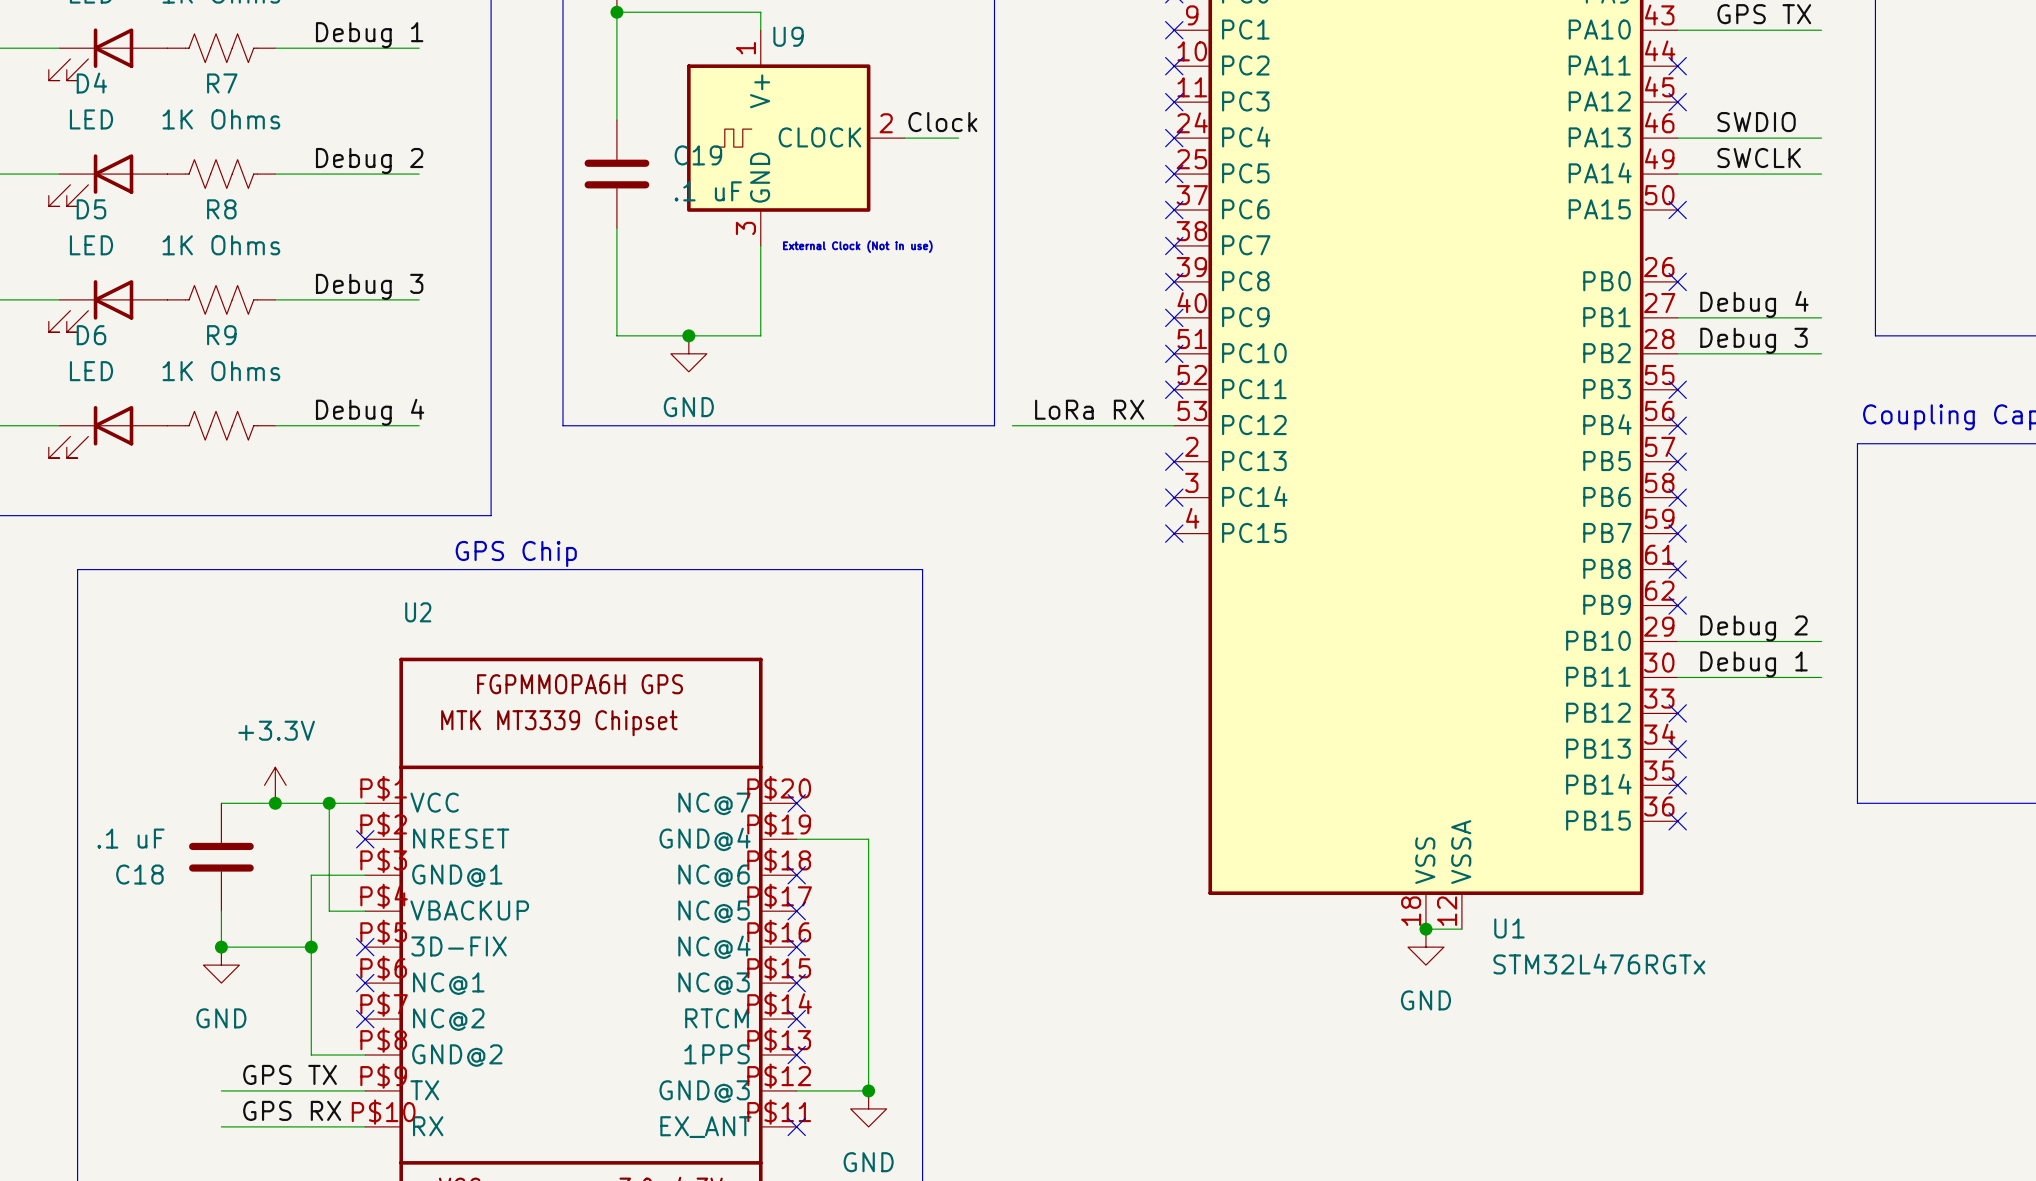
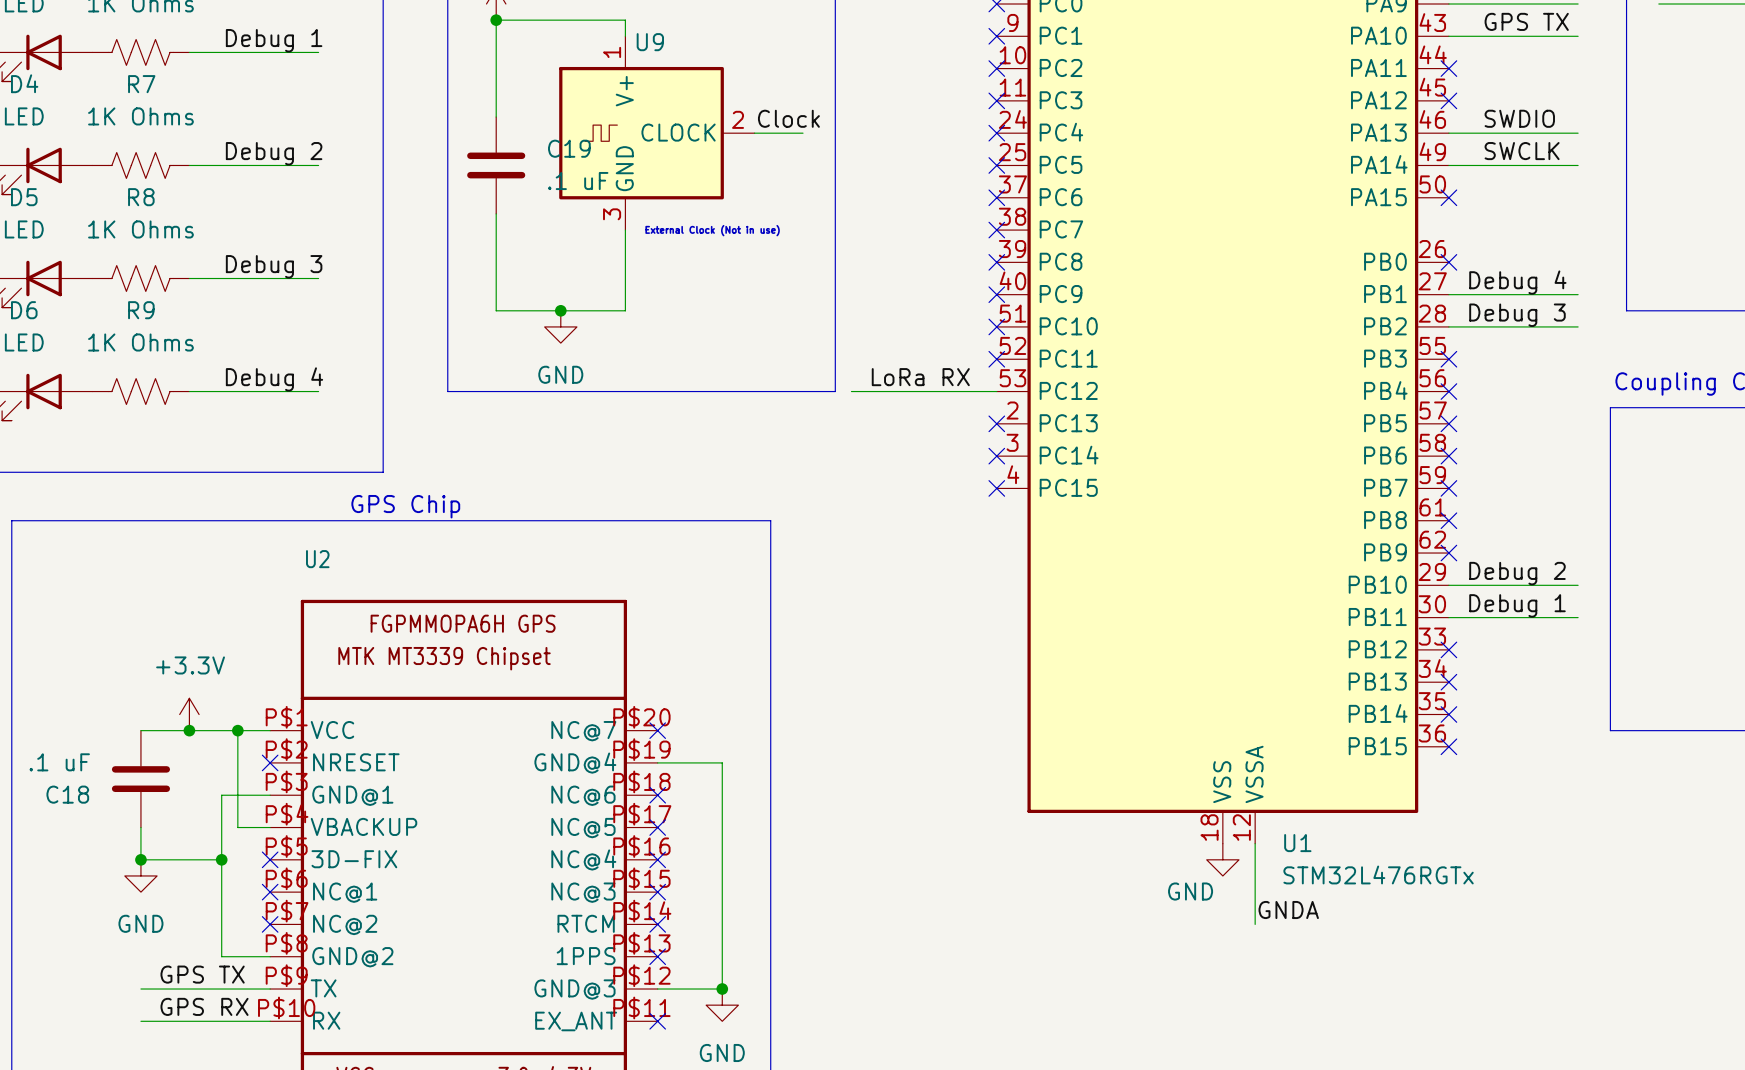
wire: (1425, 929) (1461, 929) -> (1255, 924) (1255, 843)
junction: (1425, 929) -> none
power symbol text position: GND (1425, 1000) -> GND (1190, 891)
label: none -> GNDA (1288, 910)

